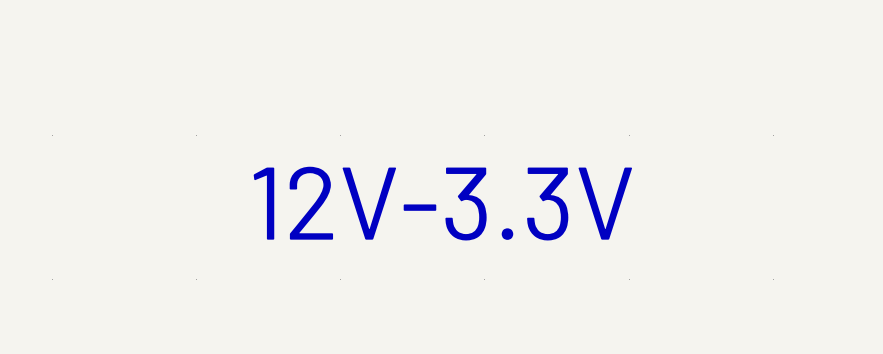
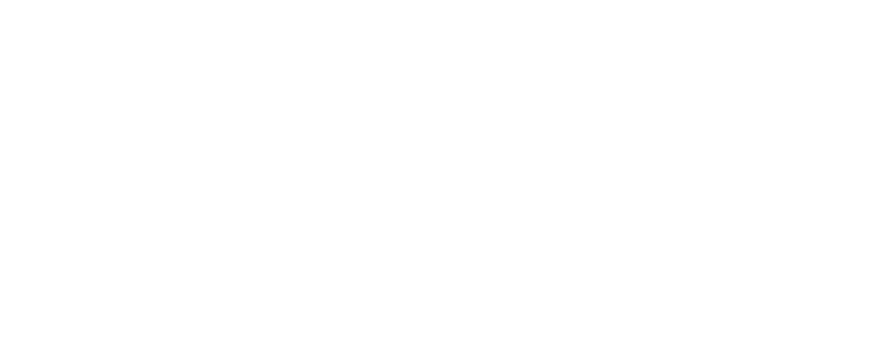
text: 12V-3.3V (442, 203) -> none

